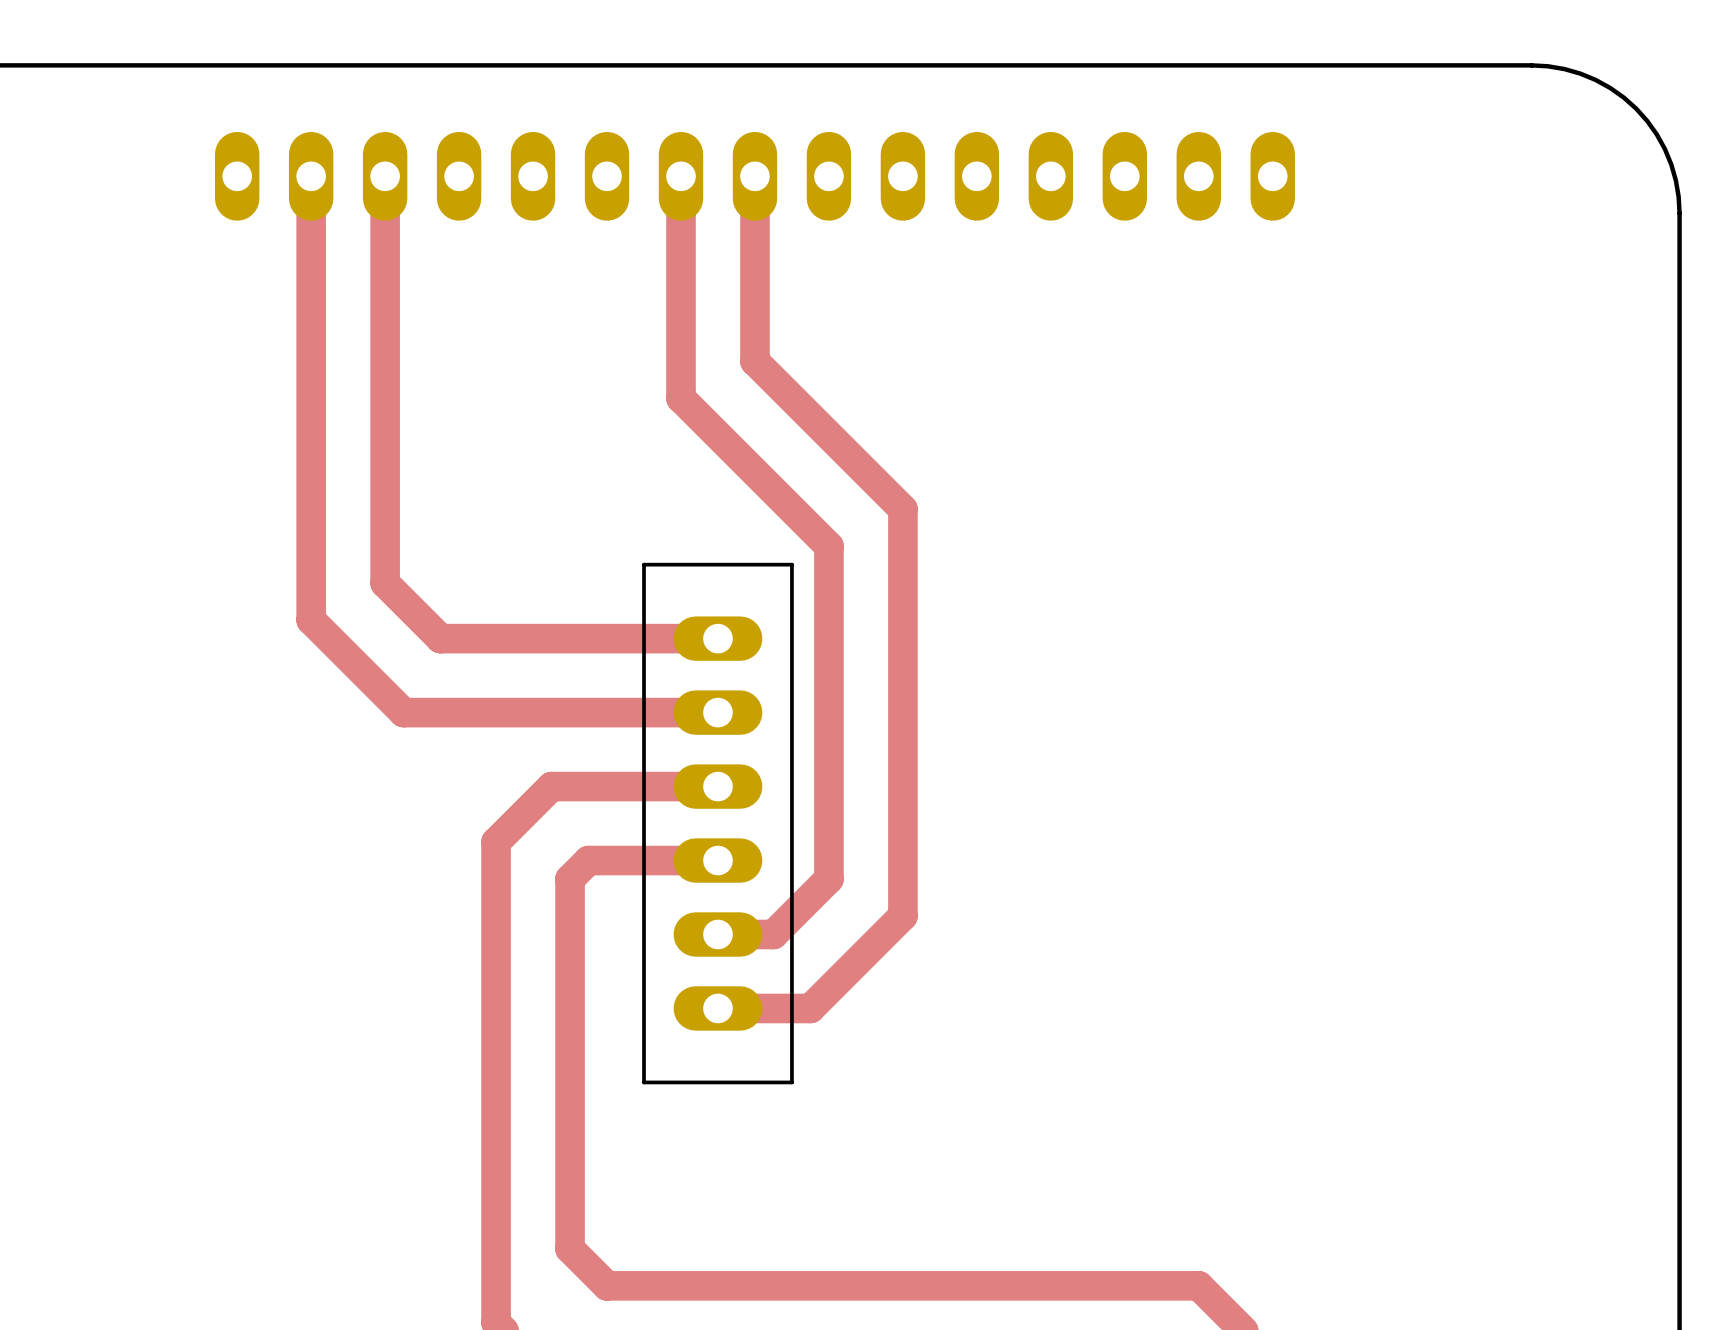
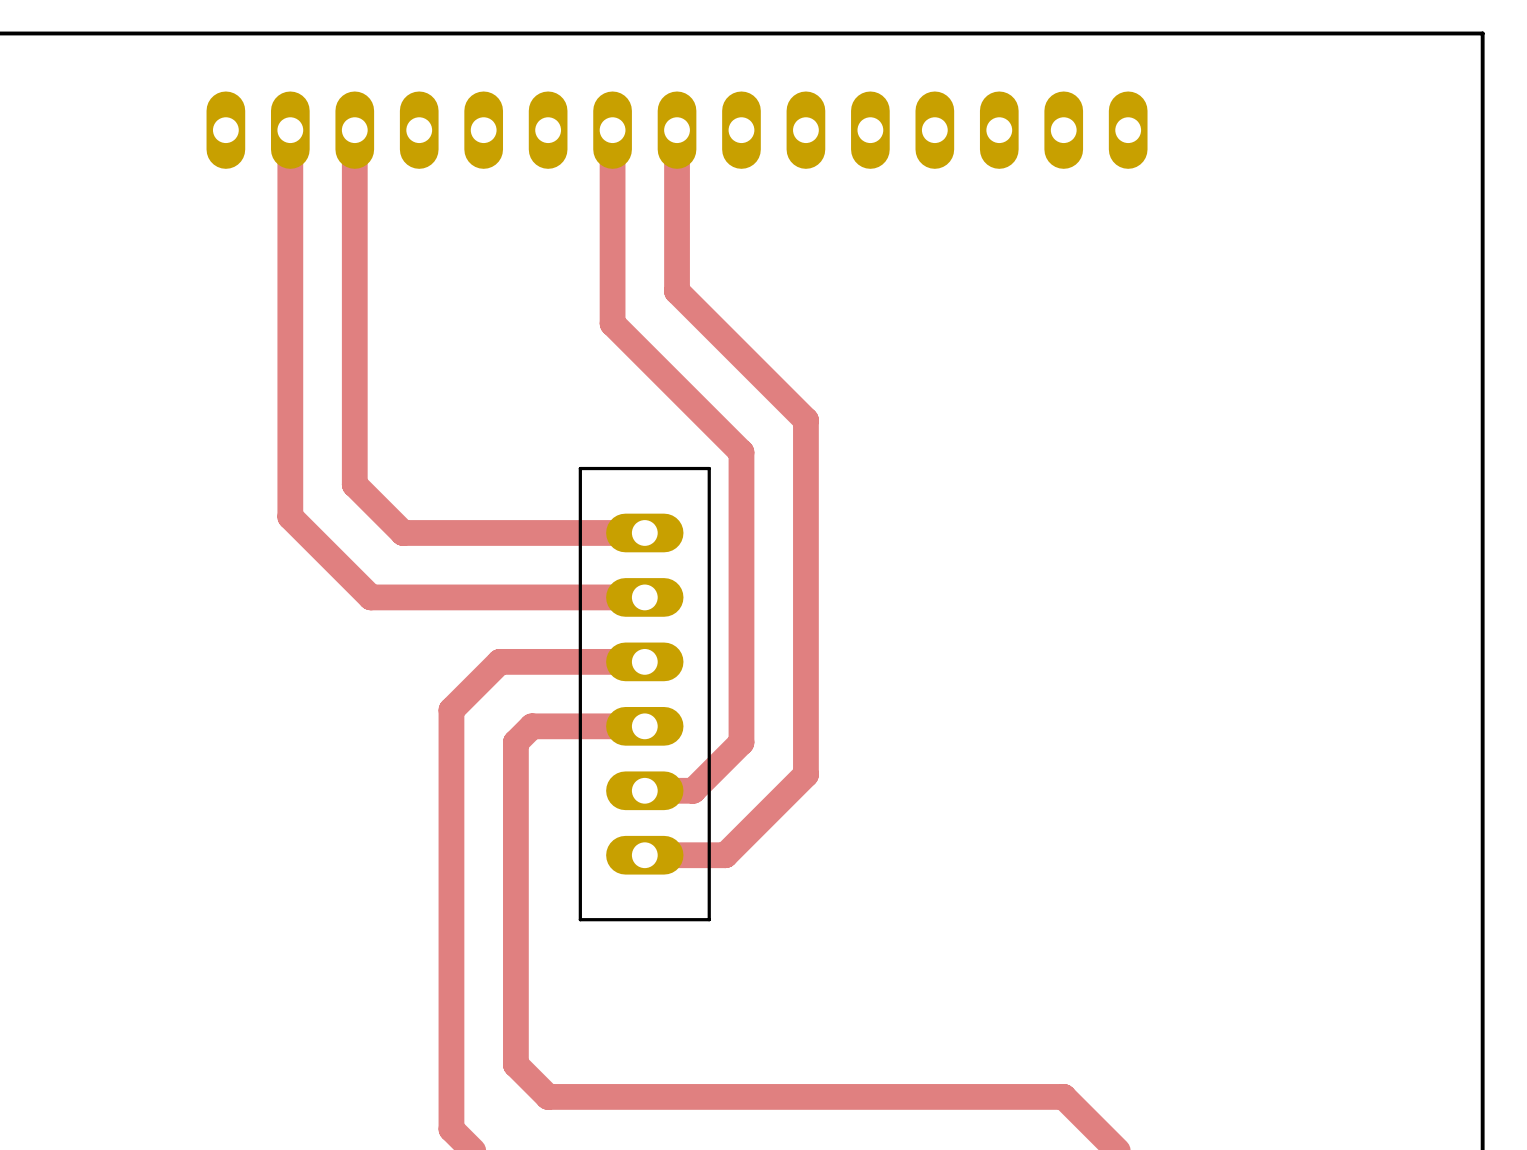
board edge: (1531, 65) (1564, 69) (1595, 80) (1610, 88) (1636, 108) (1656, 134) (1664, 149) (1675, 180) (1679, 213) -> (1353, 33) (1482, 33) (1482, 162)

